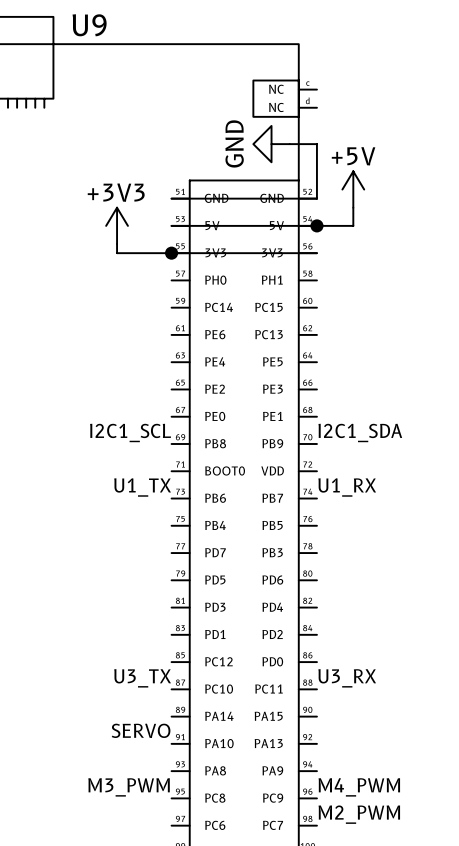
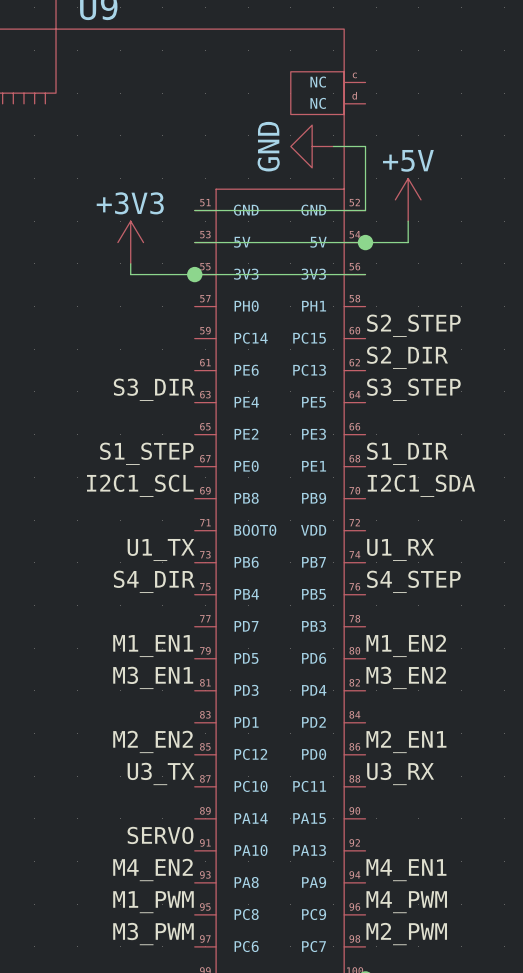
label: none -> S2_STEP (413, 325)
label: none -> S2_DIR (407, 357)
label: none -> S3_DIR (154, 389)
label: none -> S3_STEP (413, 389)
label: none -> S1_STEP (146, 453)
label: none -> S1_DIR (407, 453)
label: none -> S4_DIR (154, 581)
label: none -> S4_STEP (413, 581)
label: none -> M1_EN1 (153, 646)
label: none -> M1_EN2 (406, 645)
label: none -> M3_EN1 (153, 677)
label: none -> M3_EN2 (406, 677)
label: none -> M2_EN2 (153, 741)
label: none -> M2_EN1 (406, 741)
label: none -> M4_EN2 (153, 870)
label: none -> M4_EN1 (406, 870)
label: M3_PWM (129, 787) -> M1_PWM (153, 902)
label: none -> M3_PWM (153, 934)

